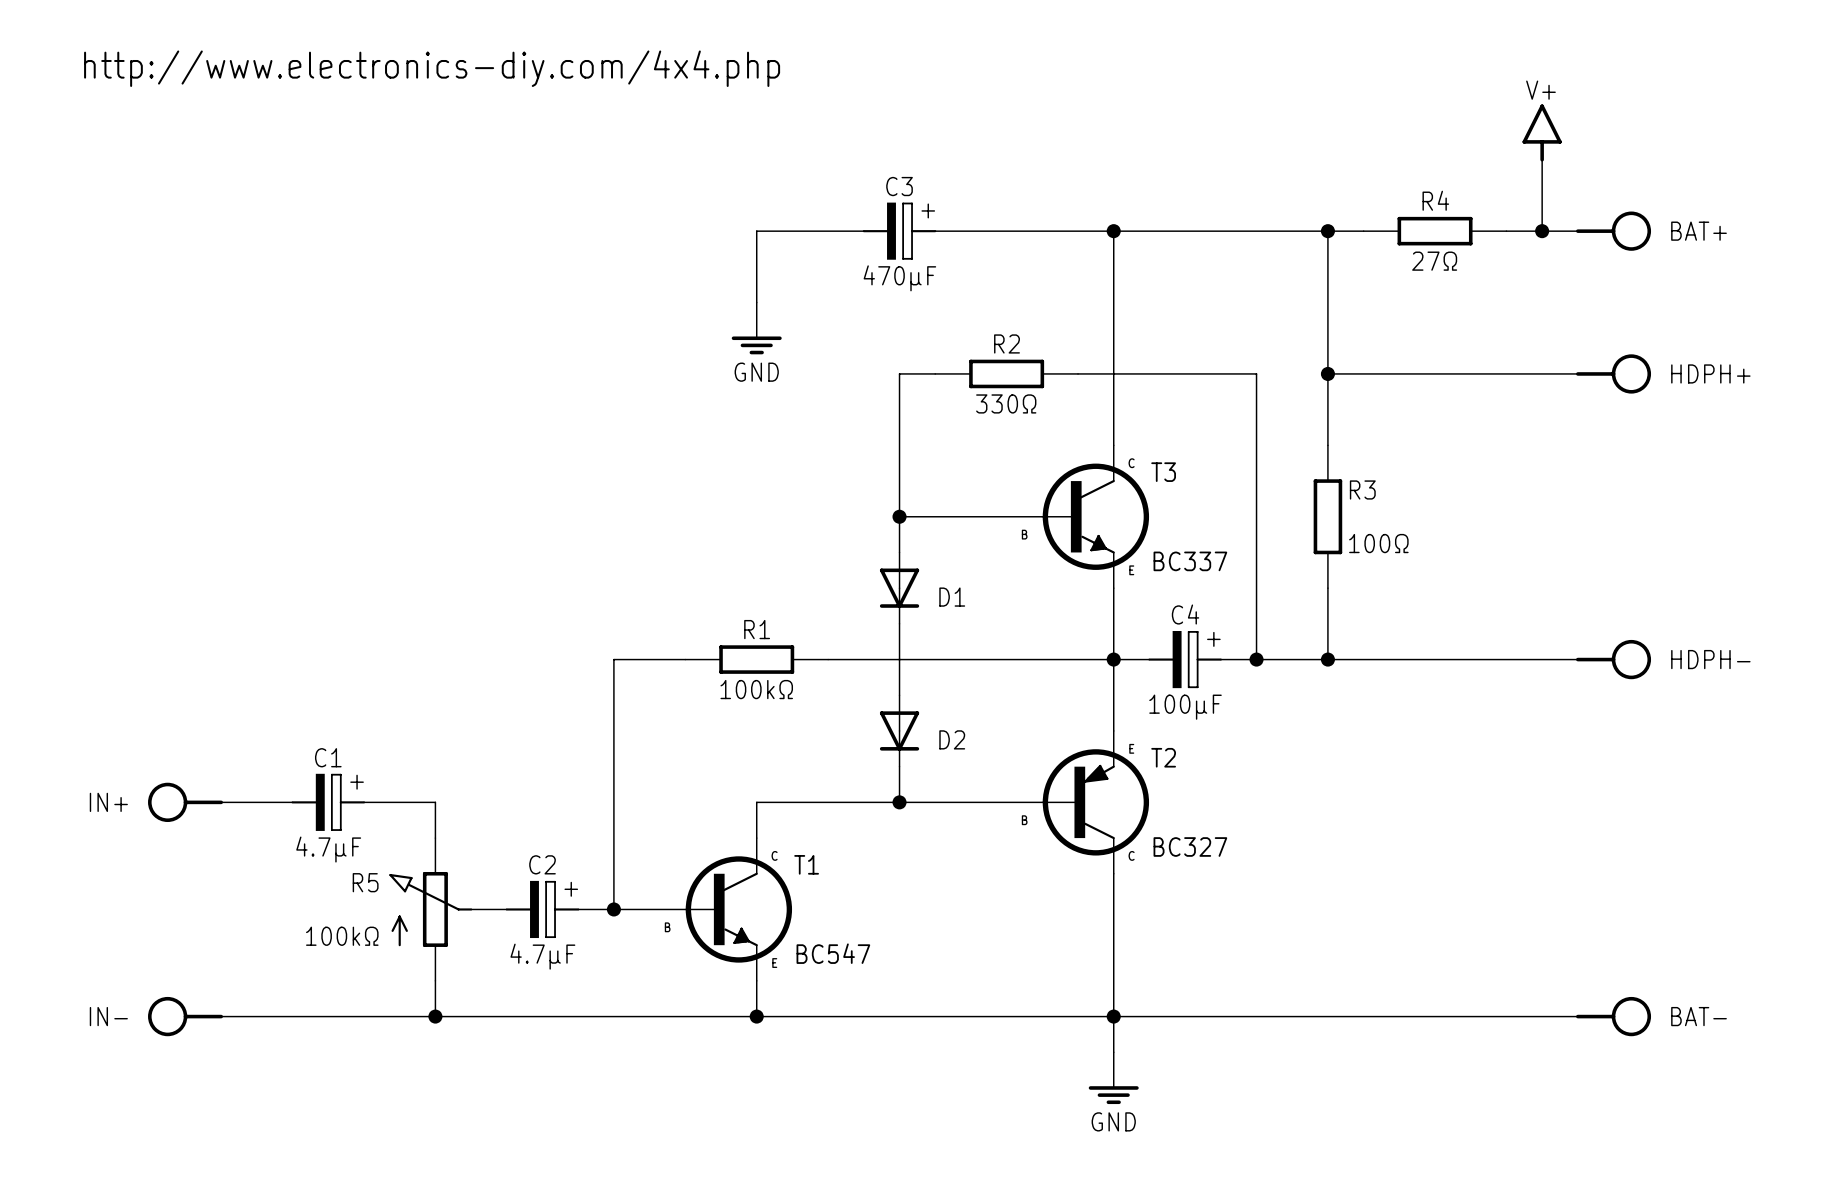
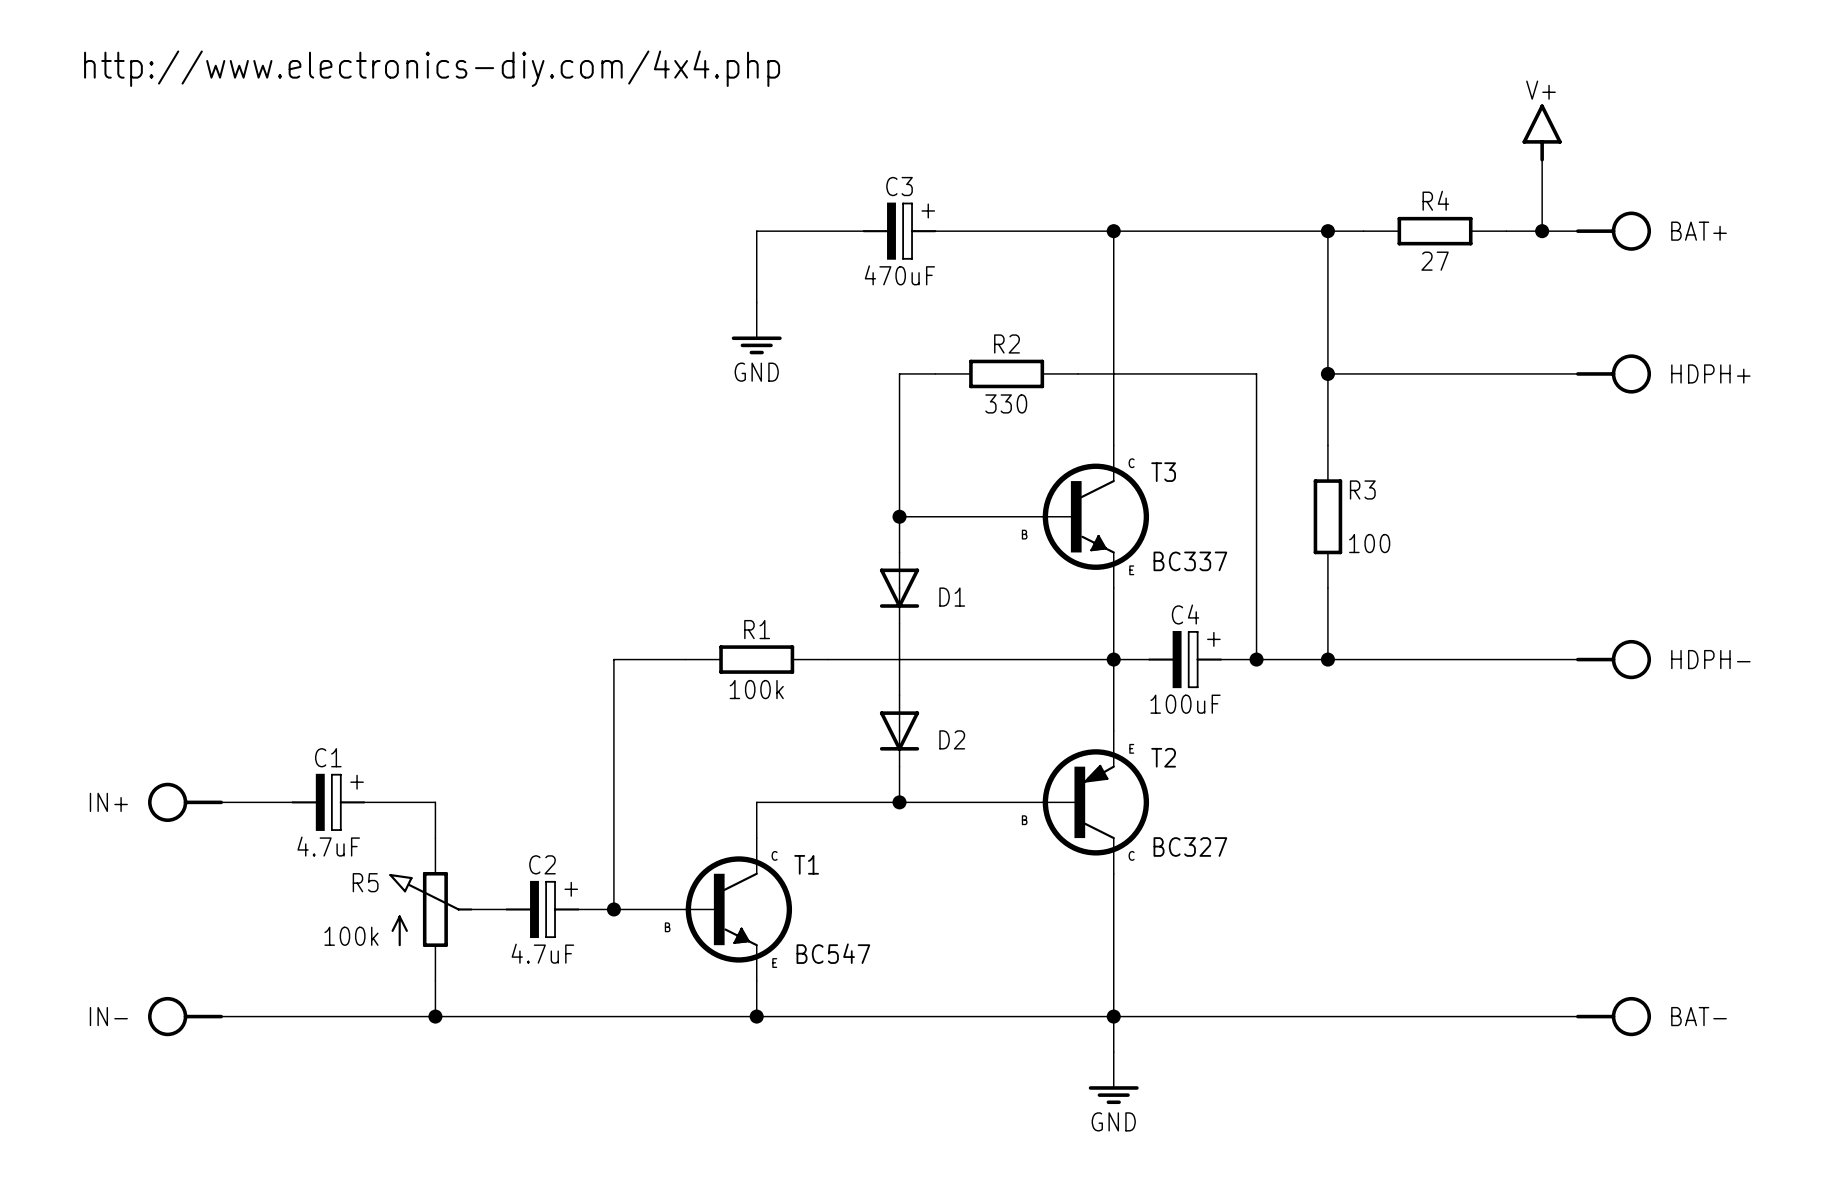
R4 value: 27Ω (1434, 261) -> 27 (1435, 261)
C3 value: 470μF (899, 278) -> 470uF (899, 275)
R2 value: 330Ω (1006, 403) -> 330 (1006, 403)
R3 value: 100Ω (1378, 543) -> 100 (1369, 543)
R1 value: 100kΩ (756, 689) -> 100k (756, 689)
C4 value: 100μF (1185, 707) -> 100uF (1185, 704)
C1 value: 4.7μF (328, 849) -> 4.7uF (328, 846)
R5 value: 100kΩ (342, 936) -> 100k (351, 936)
C2 value: 4.7μF (542, 956) -> 4.7uF (542, 953)

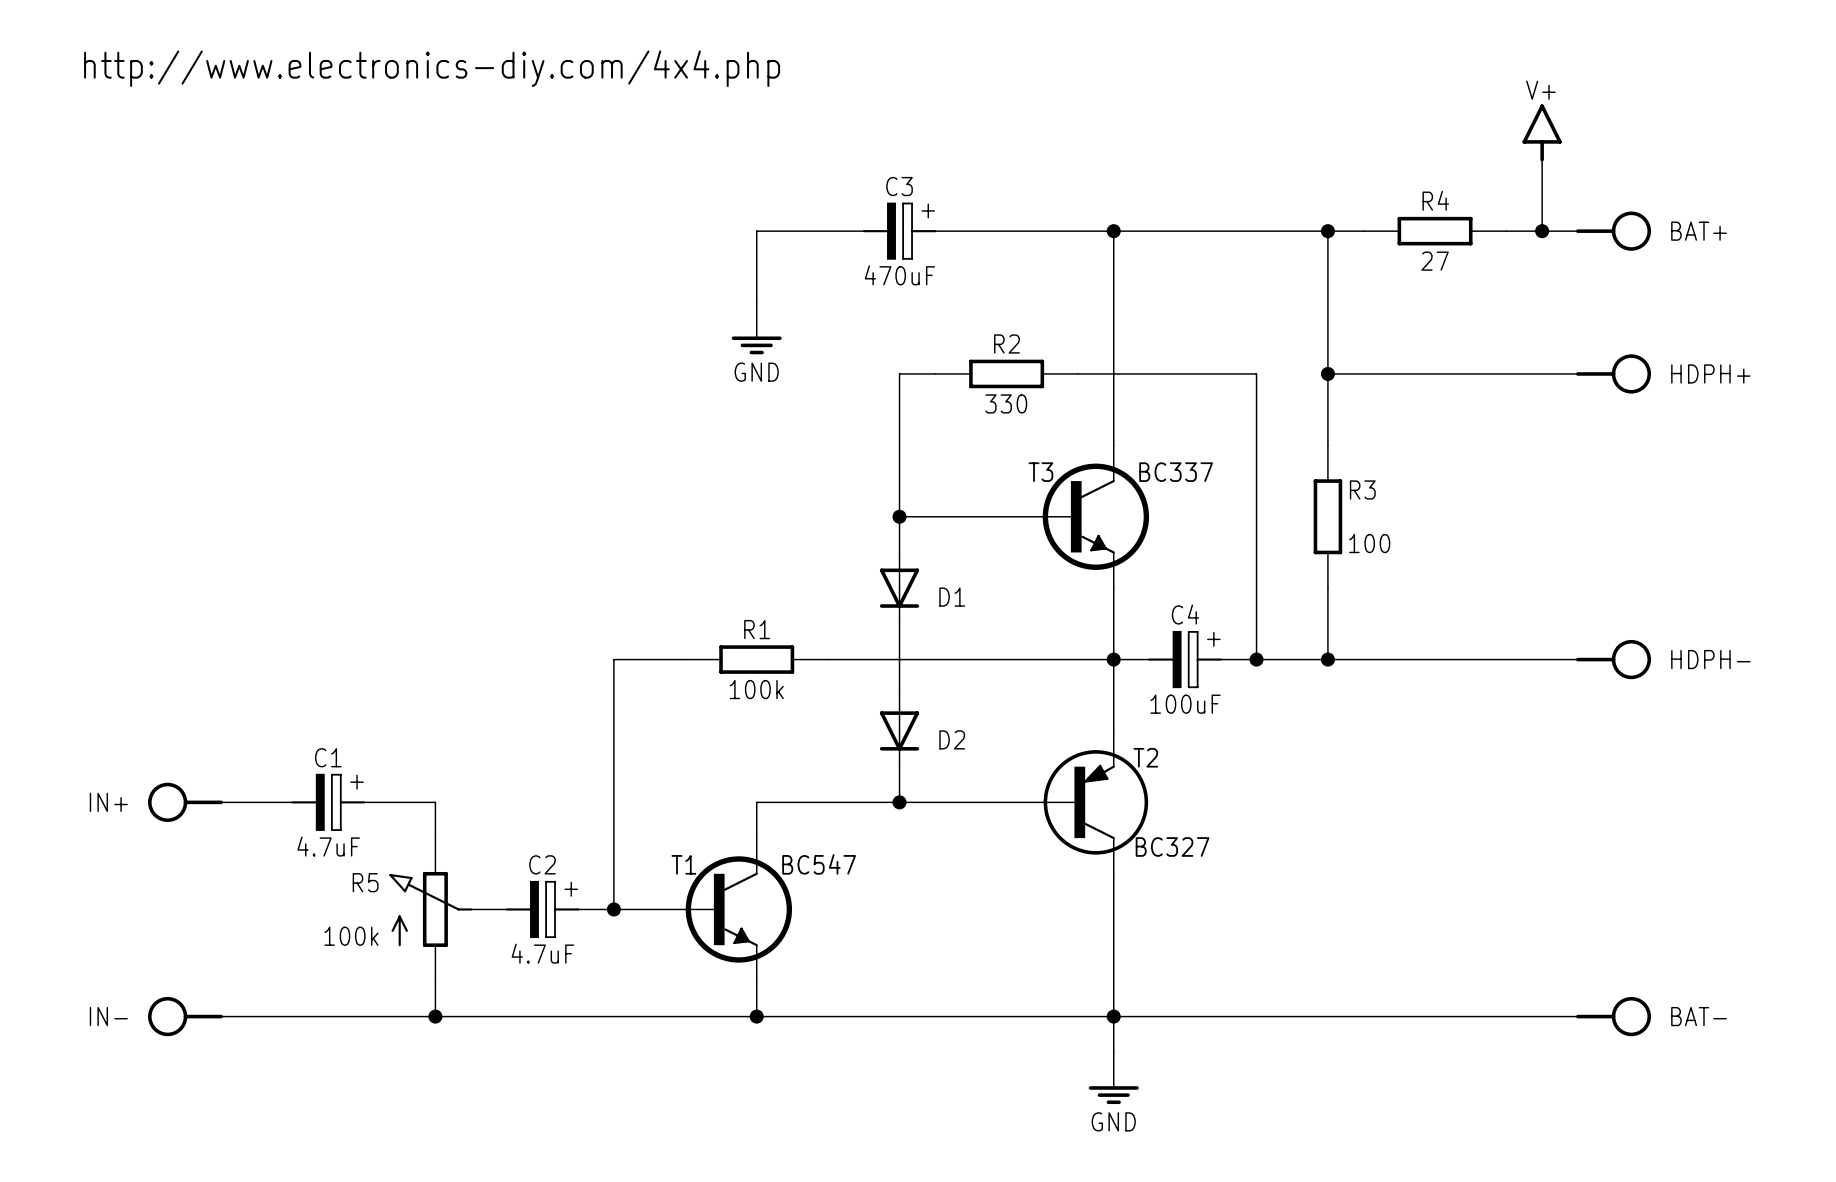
T3 text: C (1131, 463) -> none
T3 name position: T3 (1163, 472) -> T3 (1040, 472)
T3 text: B (1024, 534) -> none
T3 value position: BC337 (1190, 561) -> BC337 (1176, 472)
T3 text: E (1131, 570) -> none
T2 symbol: [1042, 730, 1150, 874] -> [1042, 730, 1149, 874]
T1 text: C (774, 855) -> none
T1 name position: T1 (806, 864) -> T1 (683, 864)
T1 text: B (667, 927) -> none
T1 value position: BC547 (833, 953) -> BC547 (819, 864)
T1 text: E (774, 963) -> none

